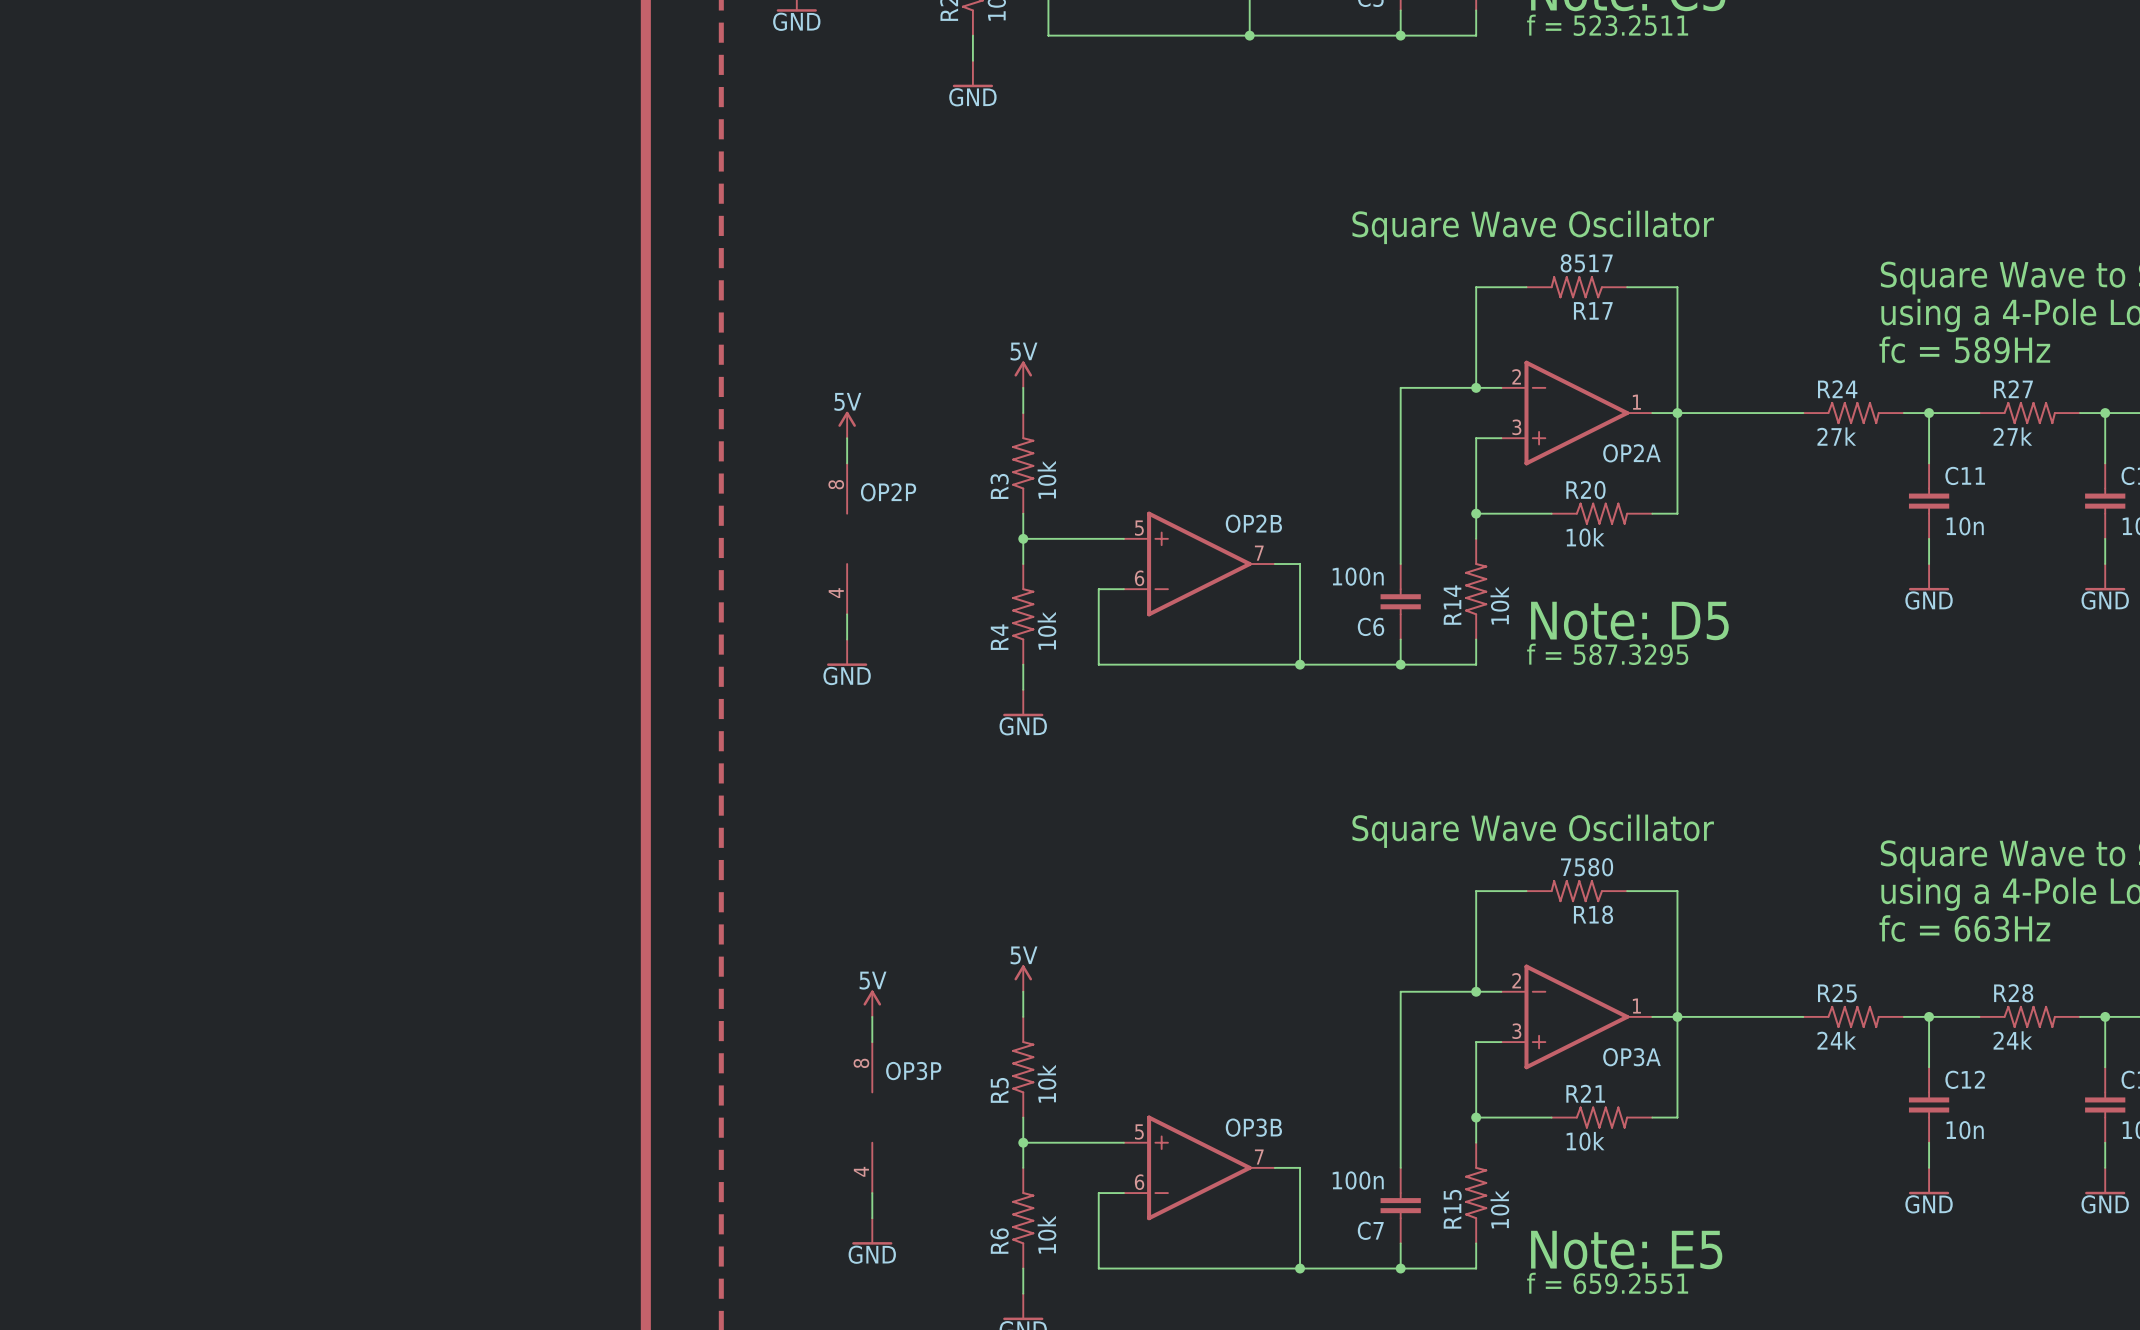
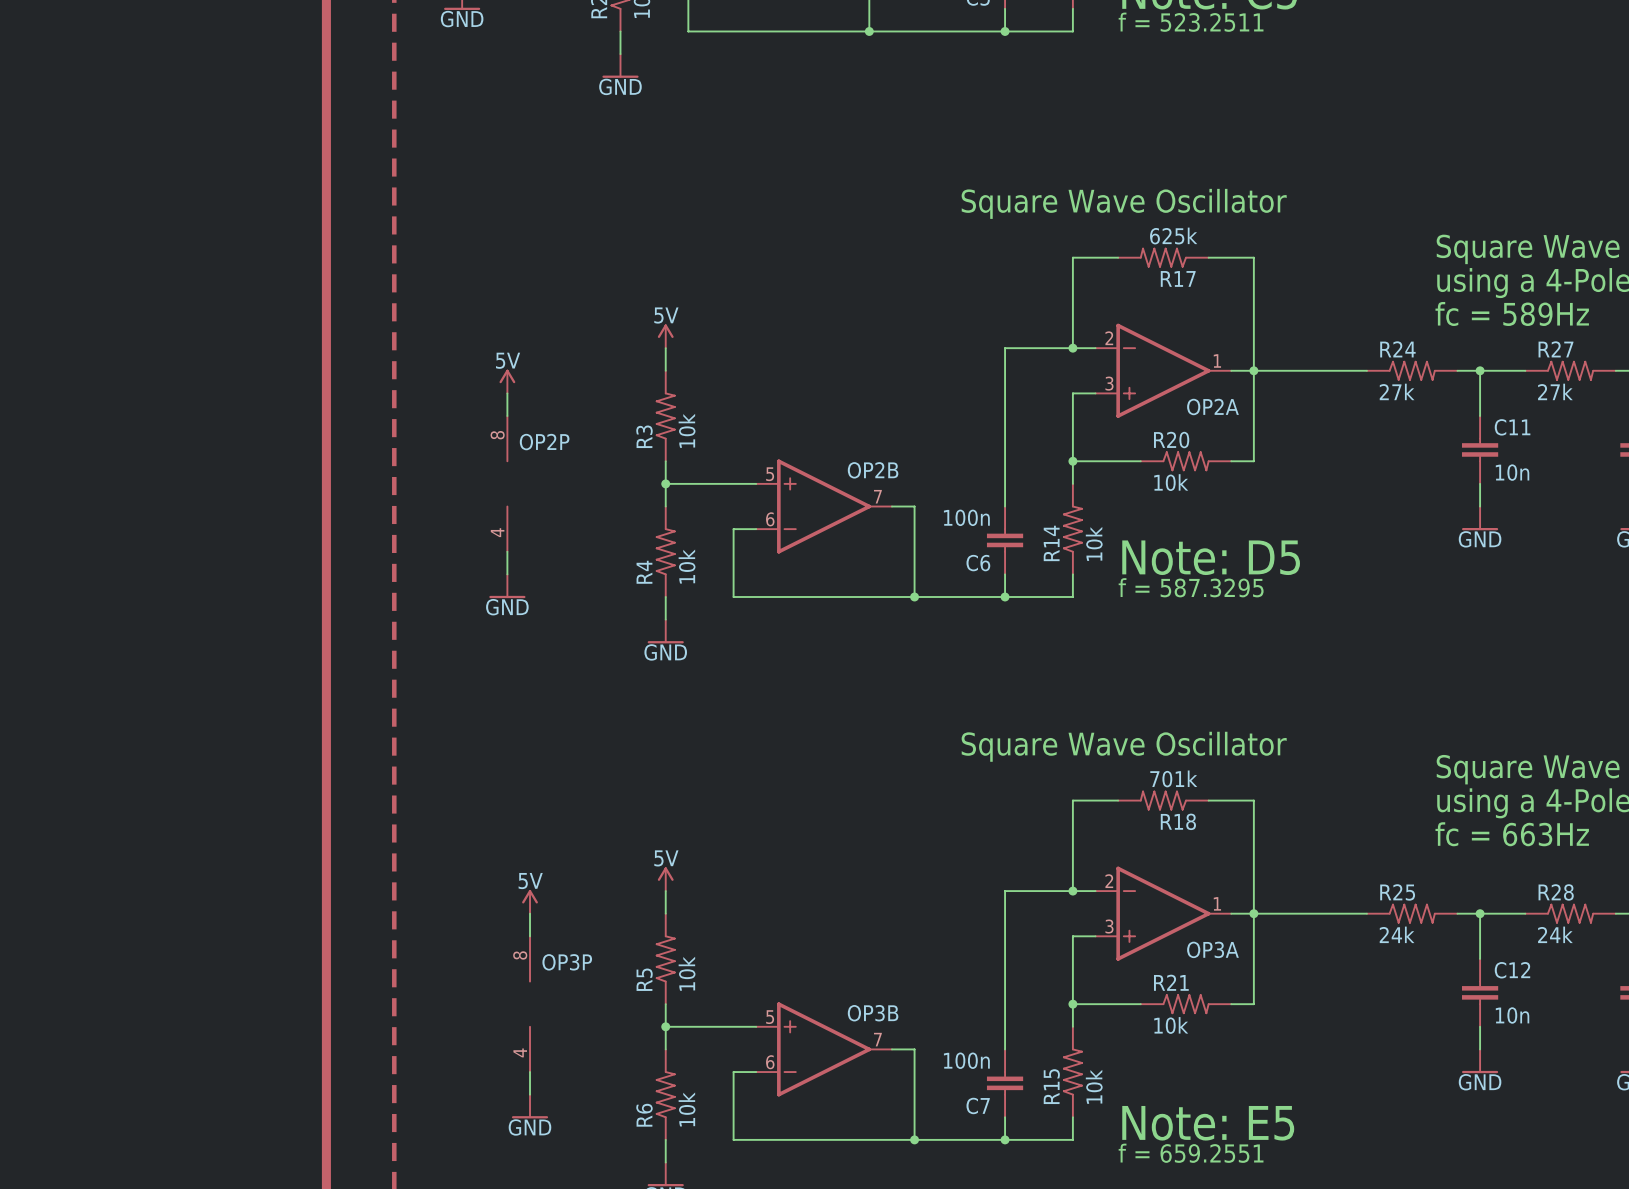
R17 value: 8517 (1586, 263) -> 625k (1173, 236)
R18 value: 7580 (1587, 867) -> 701k (1173, 778)

